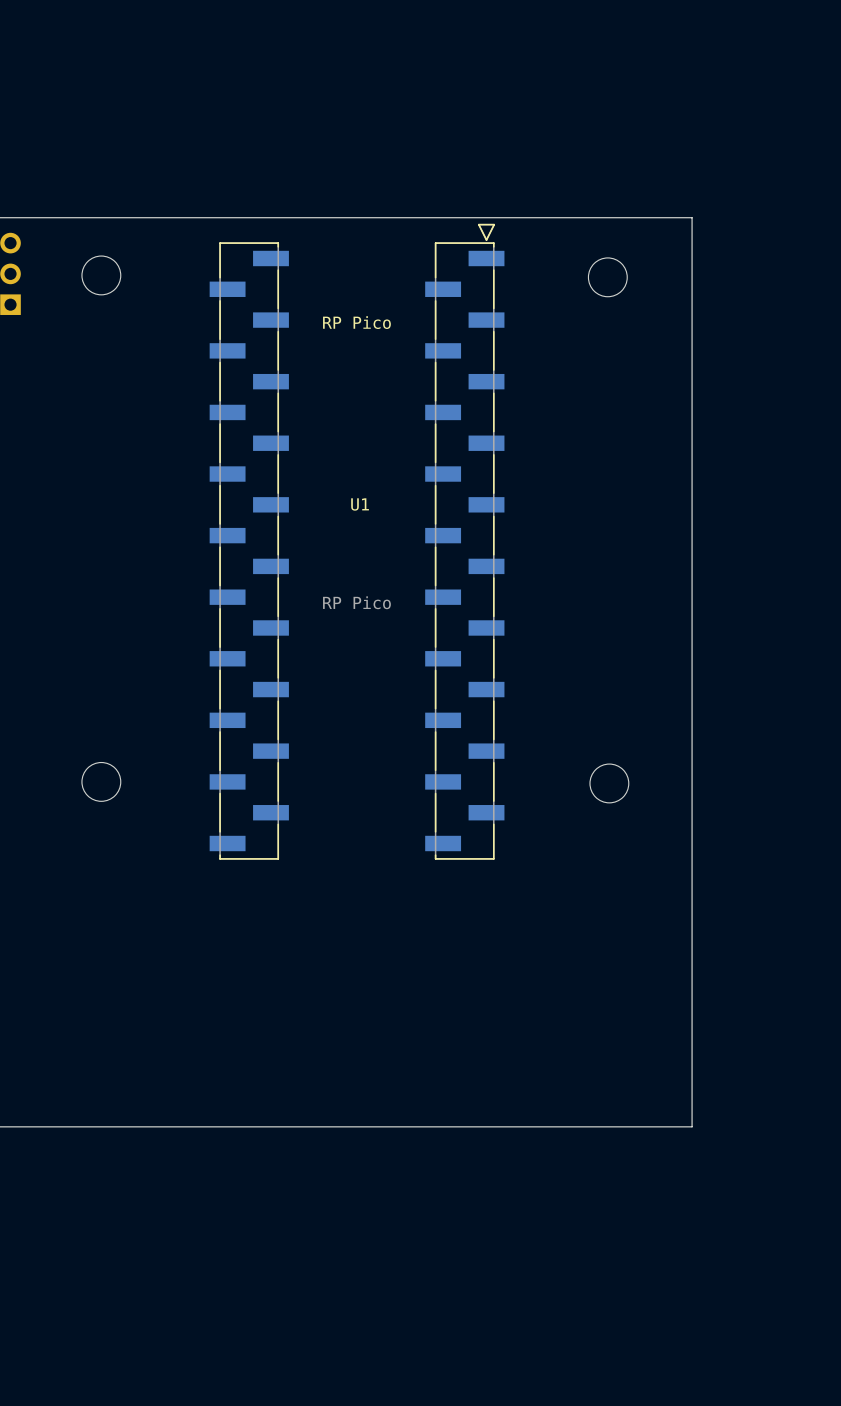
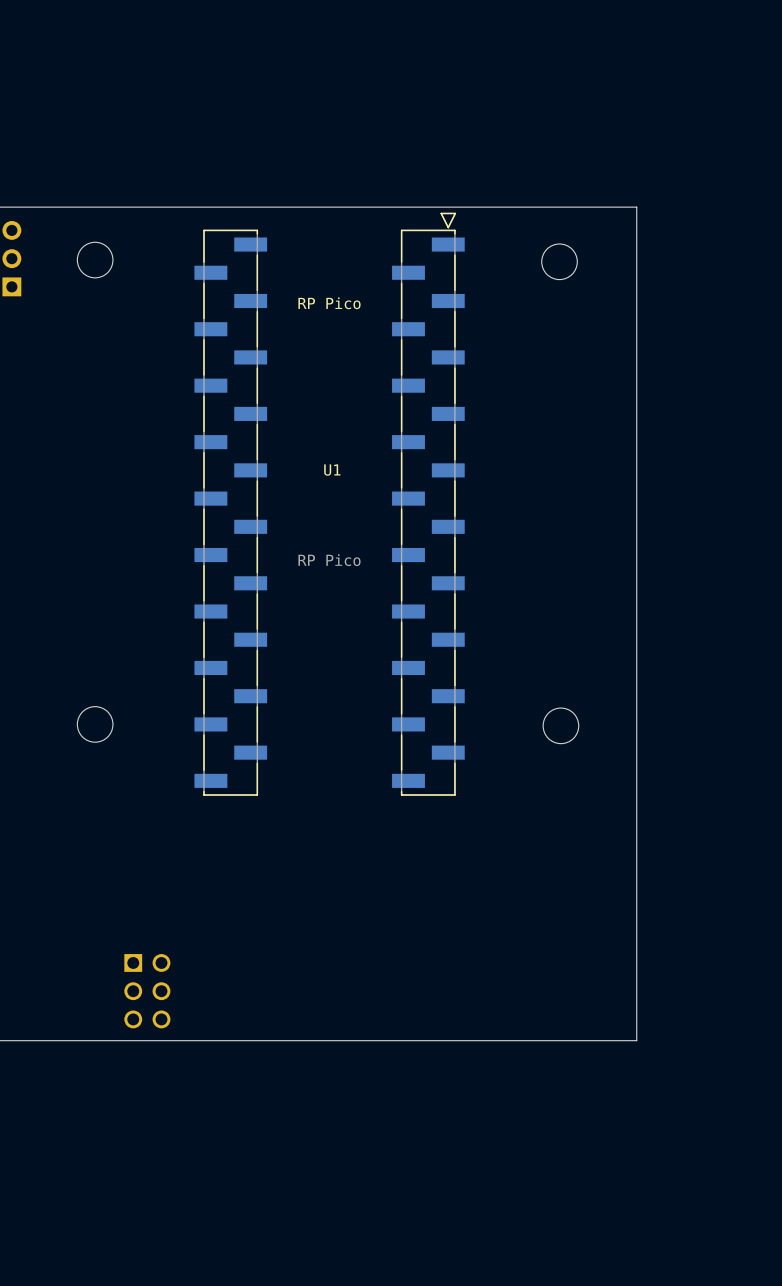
part: none -> (147, 991)

